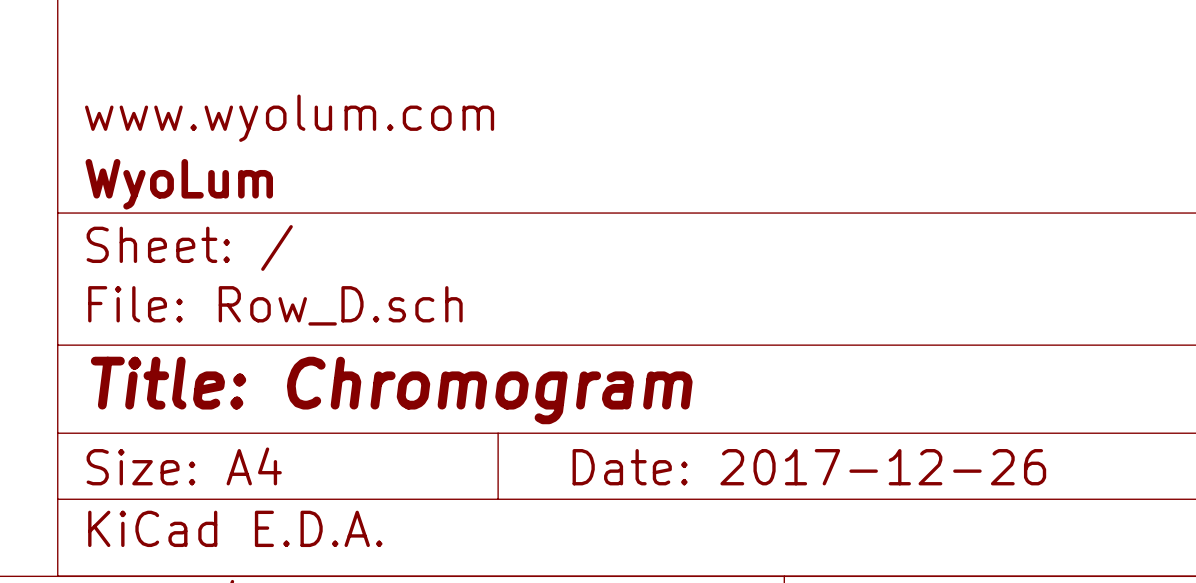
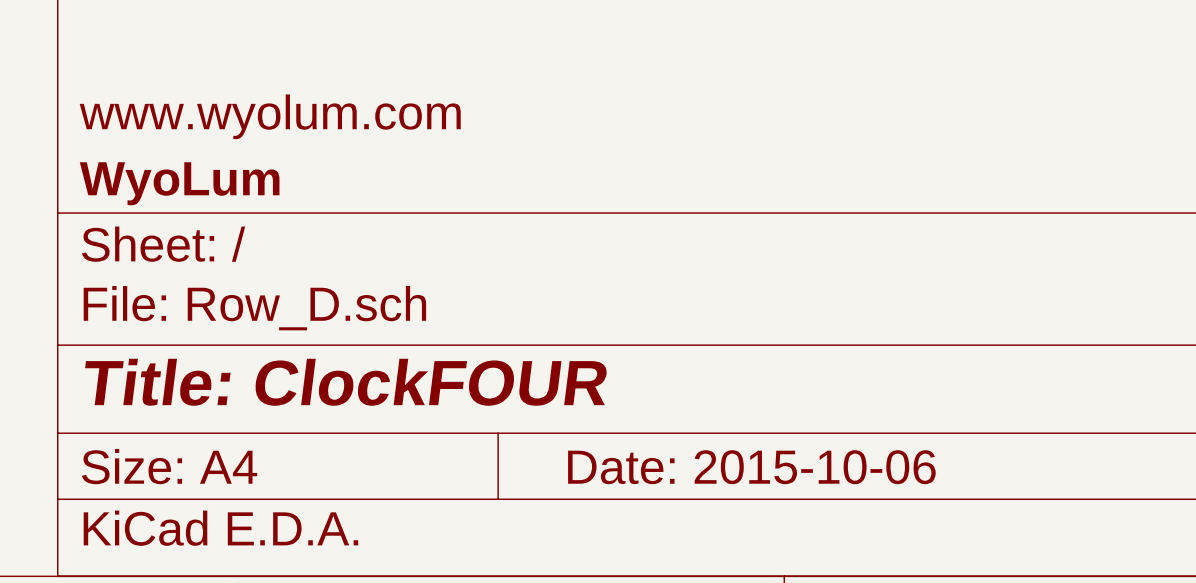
title block: Title: Chromogram (391, 390) -> Title: ClockFOUR (346, 382)
title block: Date: 2017-12-26 (809, 467) -> Date: 2015-10-06 (751, 467)

